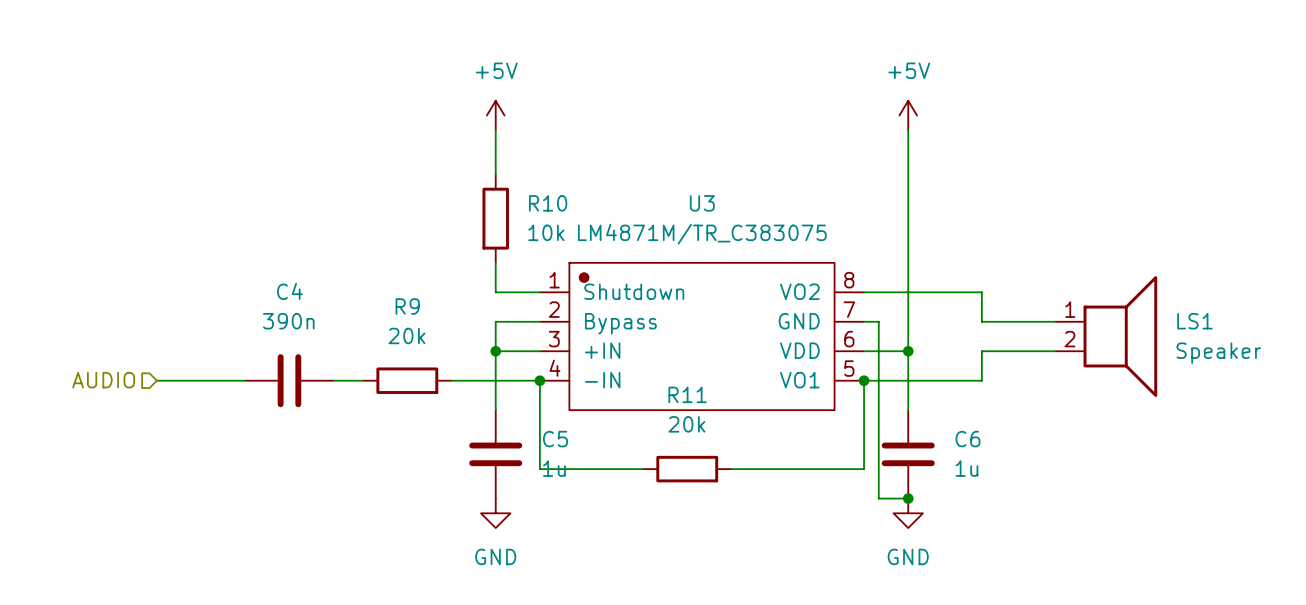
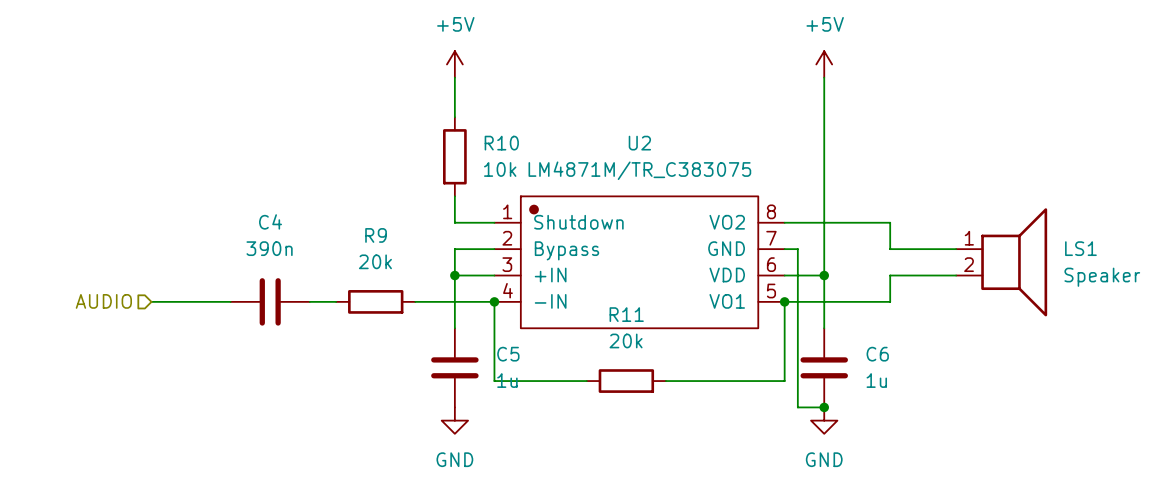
U3 name: U3 (702, 203) -> U2 (639, 143)

